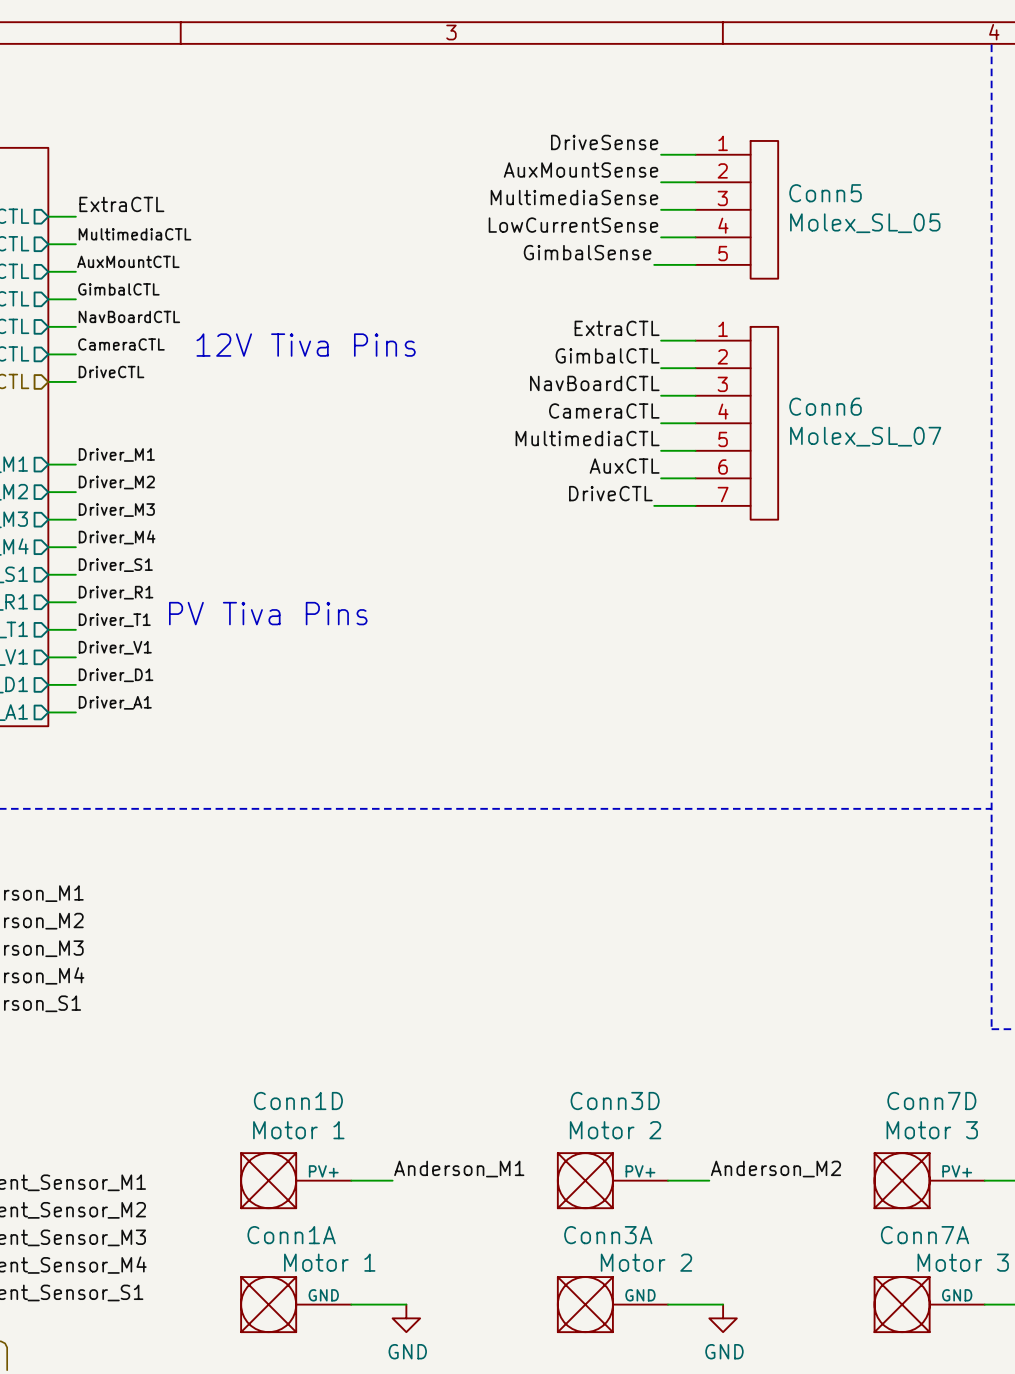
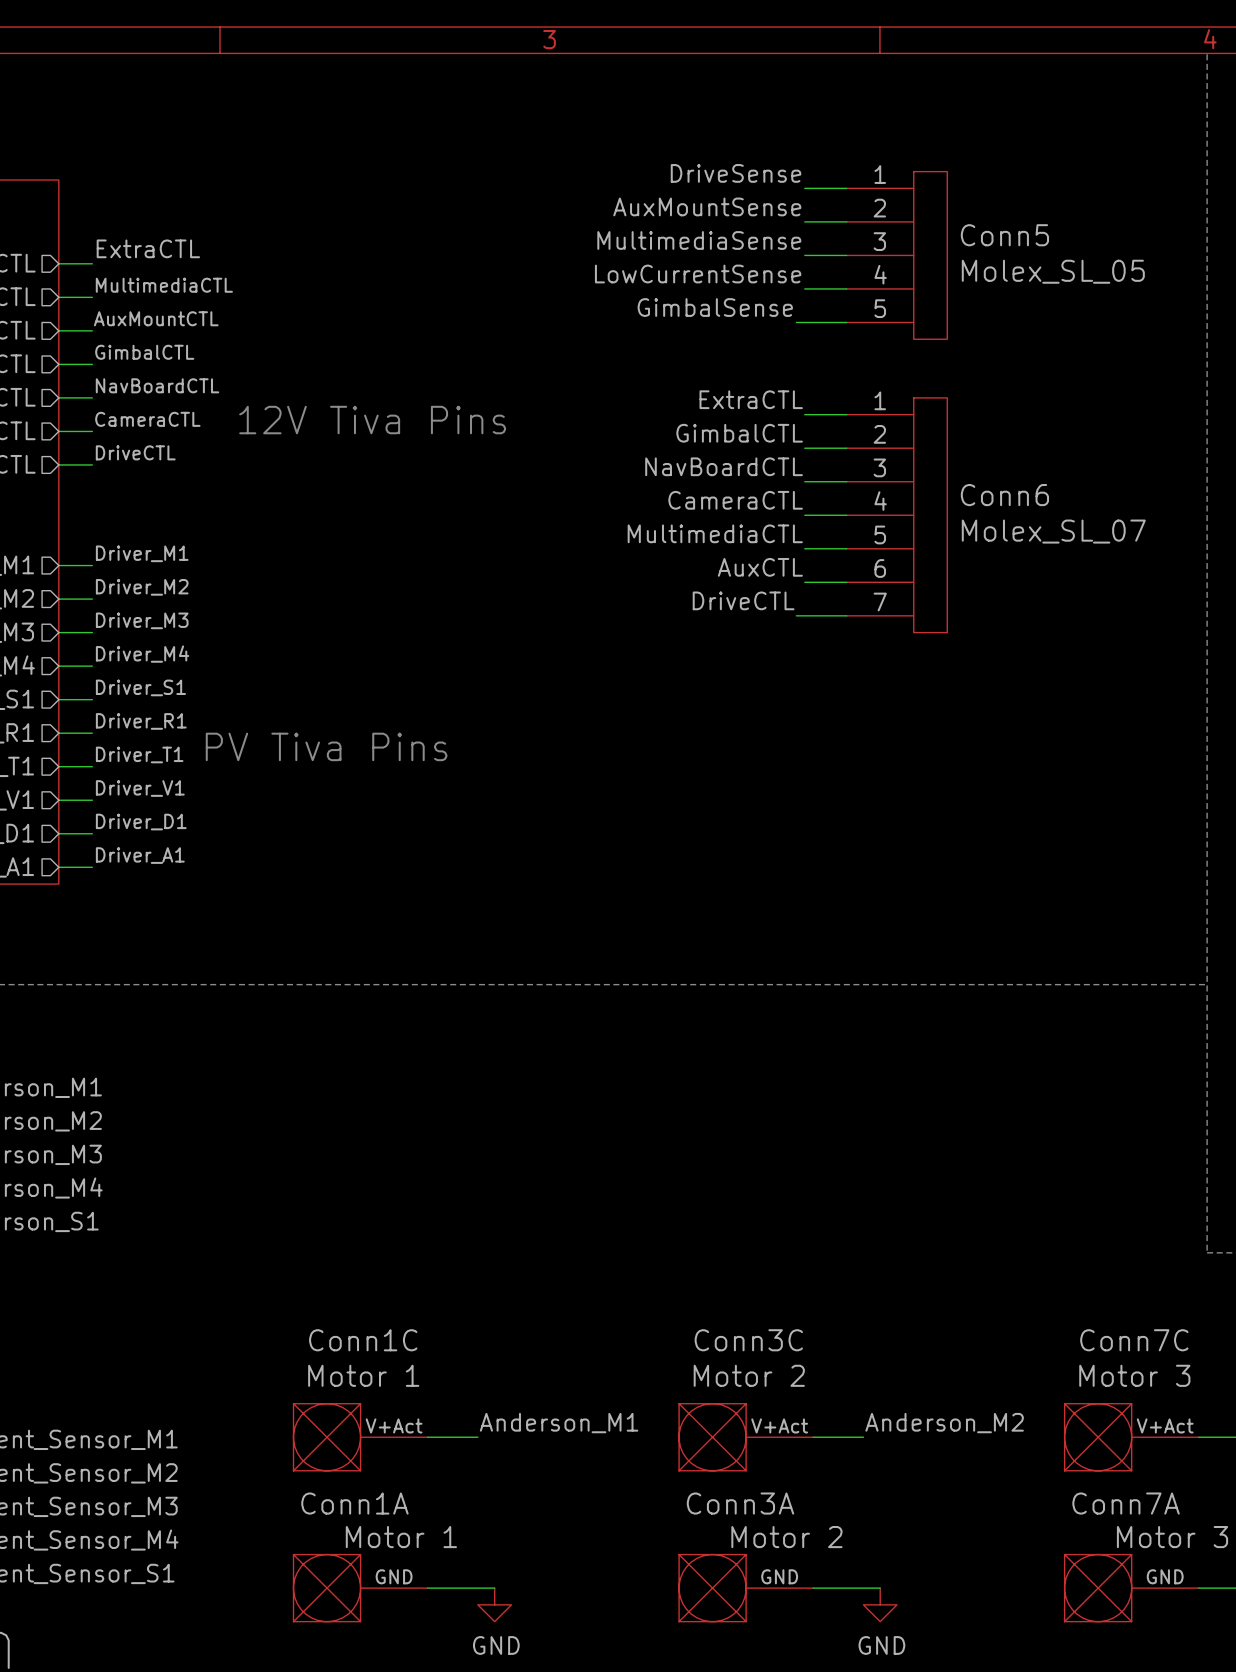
Conn1D name: Conn1D (298, 1101) -> Conn1C (363, 1340)
Conn3D name: Conn3D (615, 1101) -> Conn3C (748, 1340)
Conn7D name: Conn7D (931, 1101) -> Conn7C (1134, 1340)
Conn1D pin name: PV+ (323, 1171) -> V+Act (394, 1425)
Conn3D pin name: PV+ (640, 1171) -> V+Act (779, 1425)
Conn7D pin name: PV+ (957, 1171) -> V+Act (1165, 1425)

